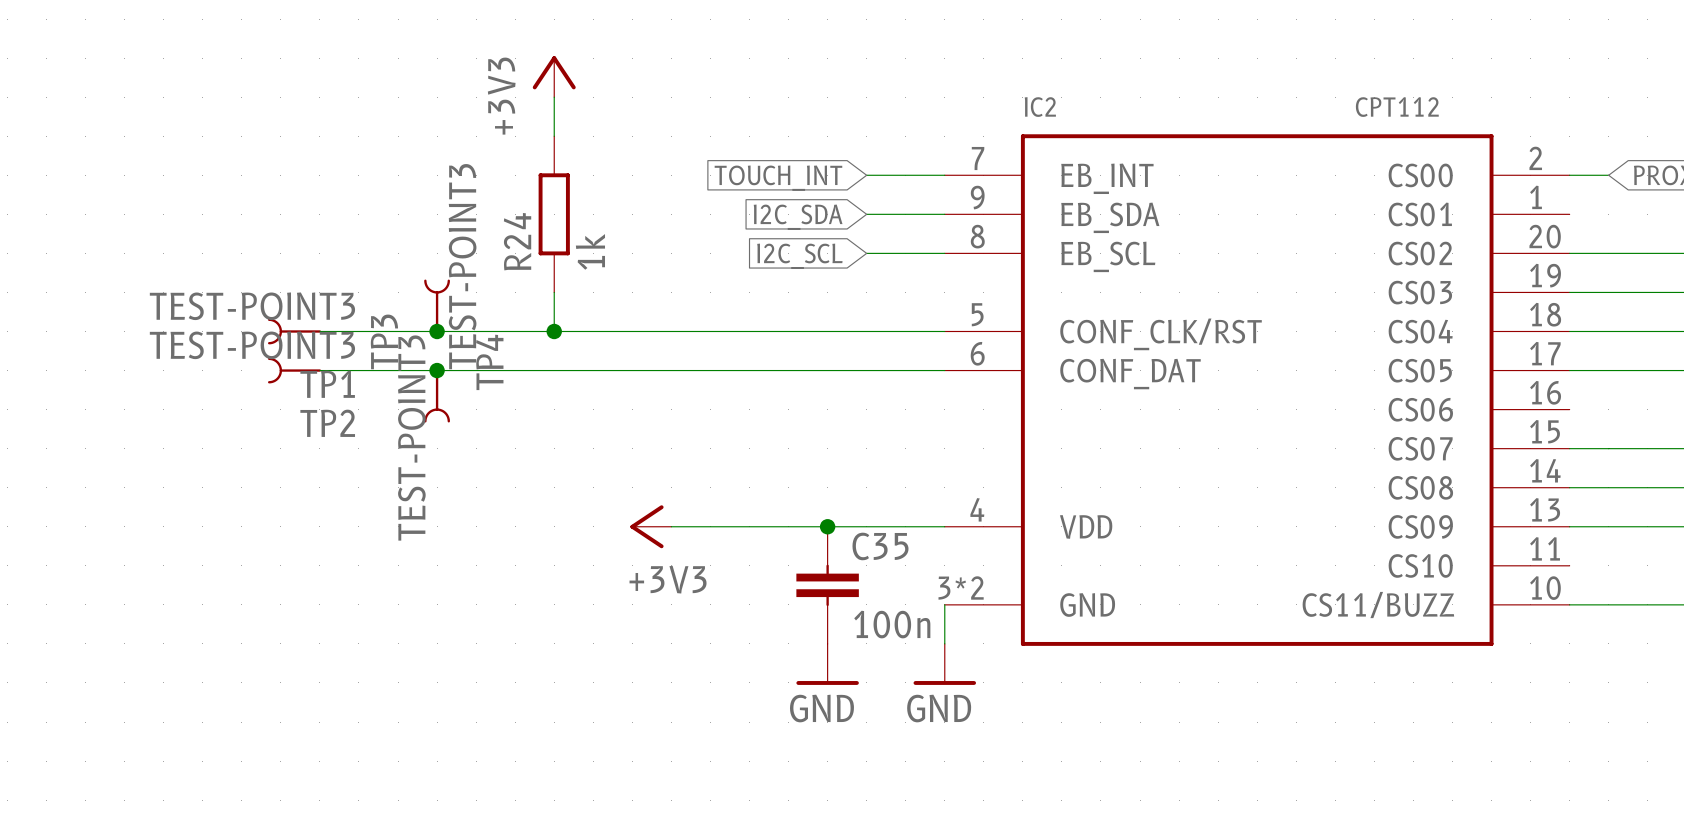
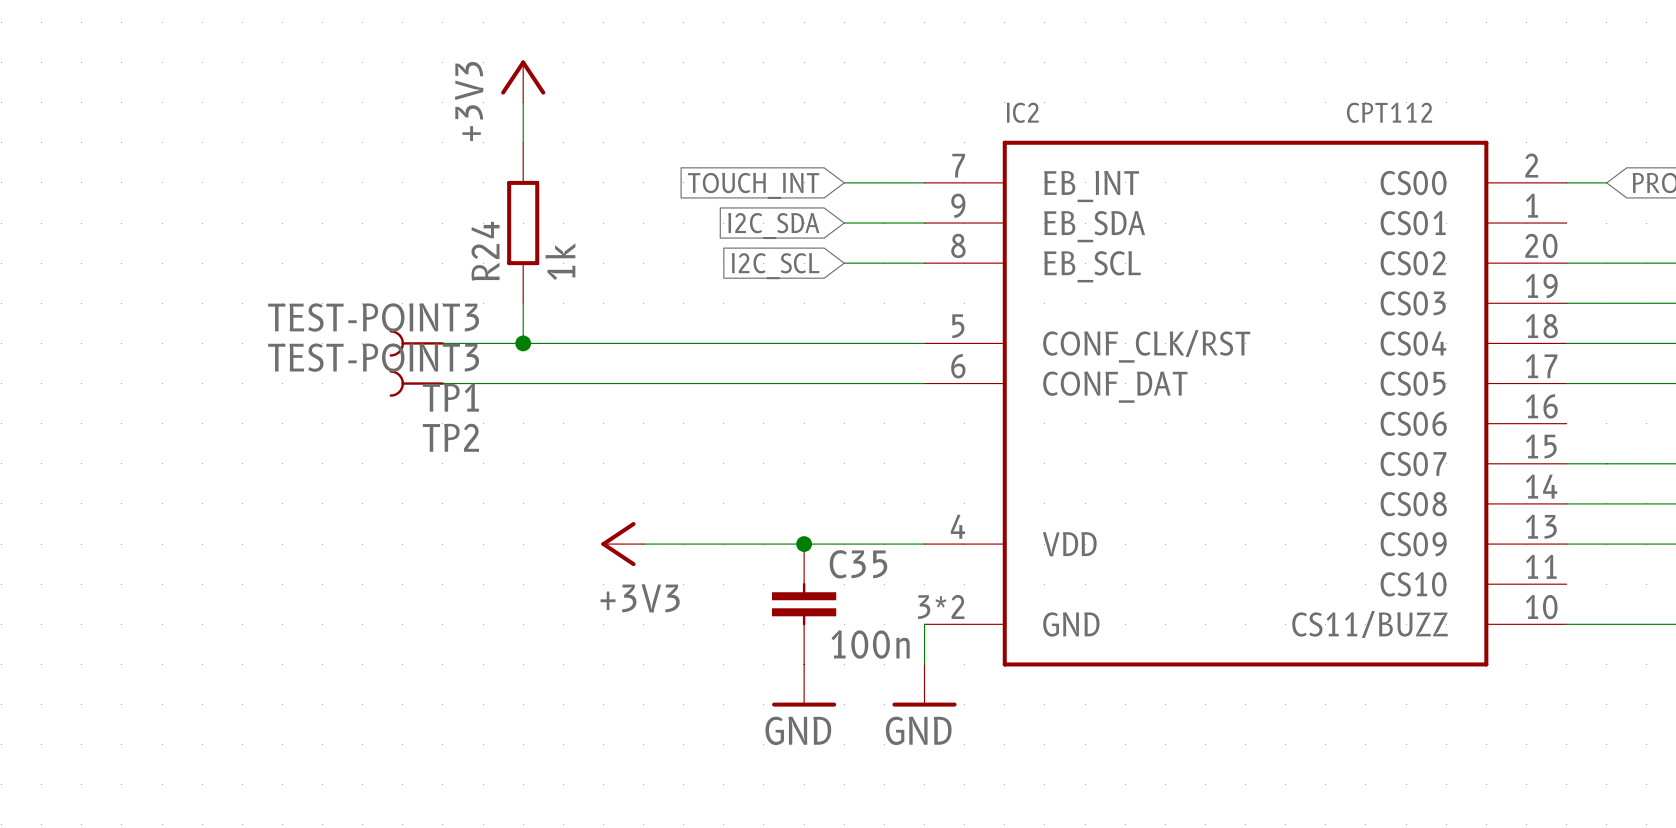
TP3: TEST-POINT3 (437, 306) -> none
TP1 position: (294, 331) -> (416, 343)
wire: (319, 331) (476, 331) -> none
junction: (437, 331) -> none
TP2 position: (294, 370) -> (416, 383)
wire: (319, 370) (476, 370) -> none
junction: (437, 370) -> none
TP4: TEST-POINT3 (437, 395) -> none

